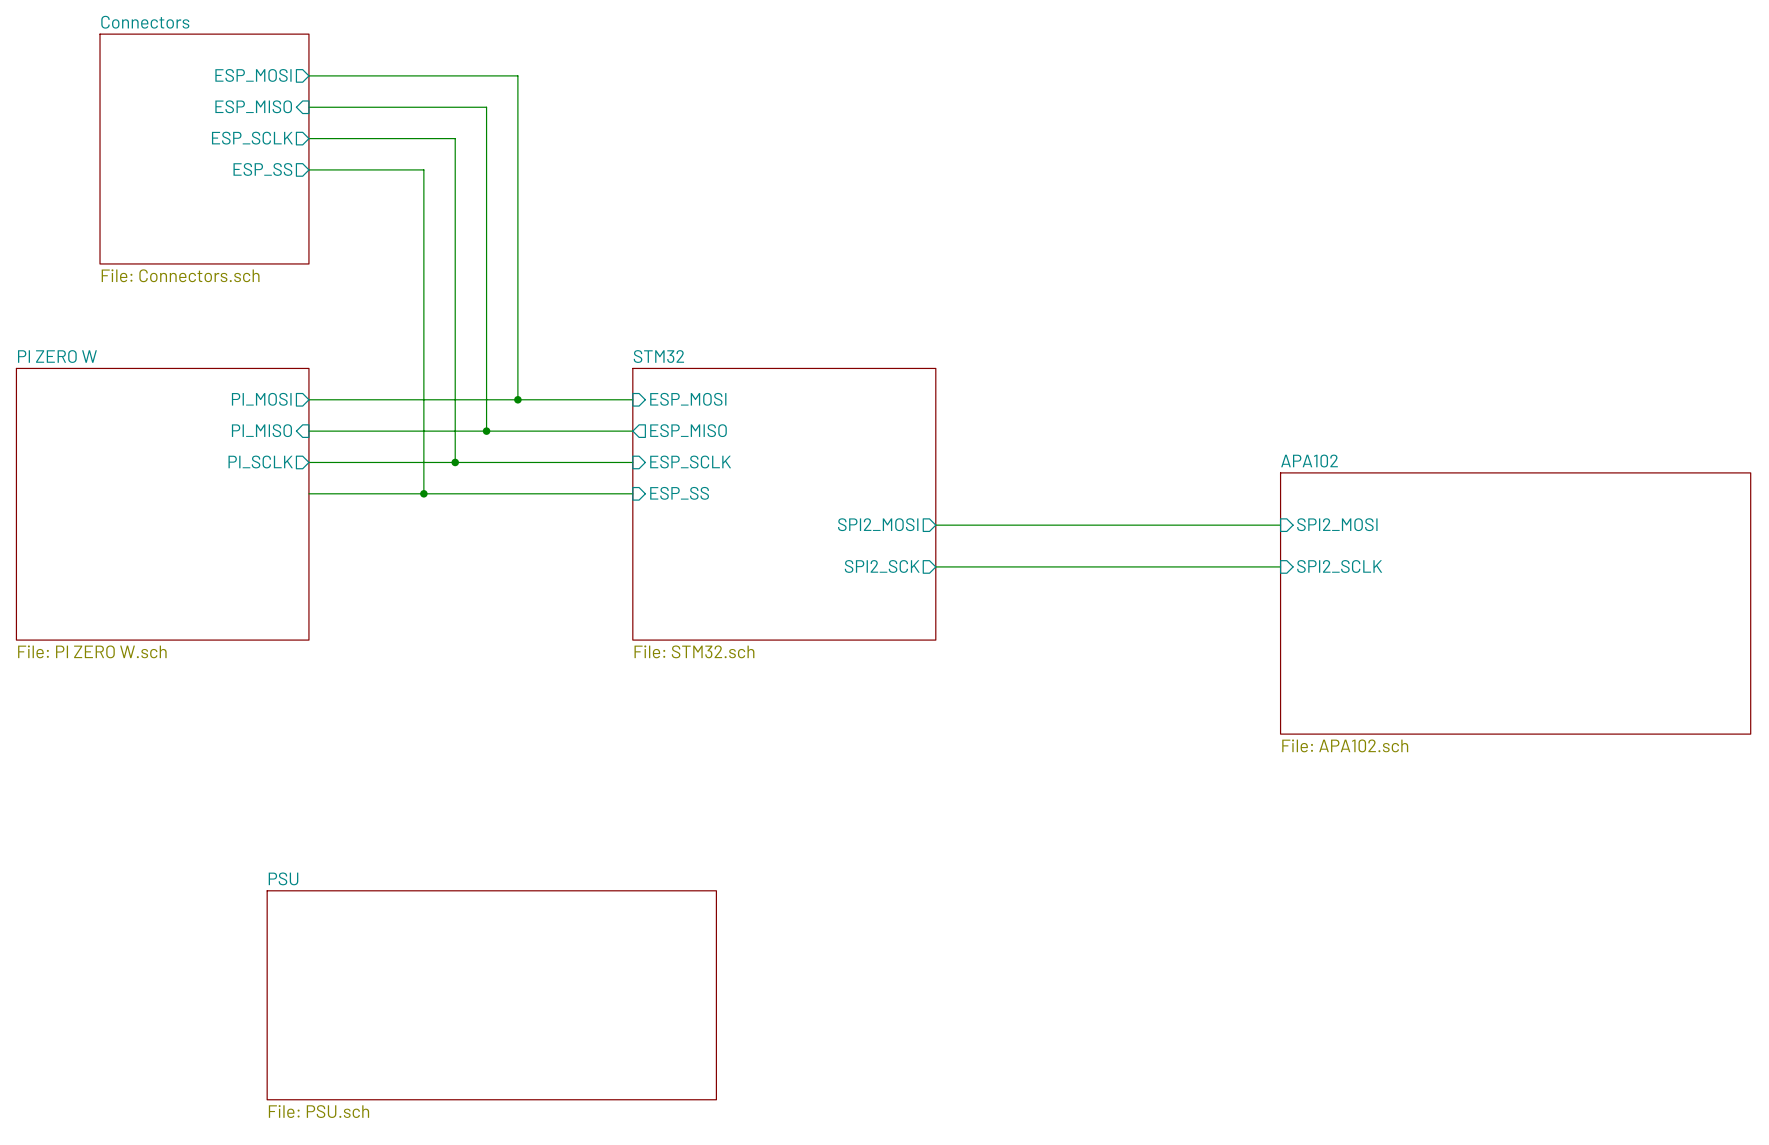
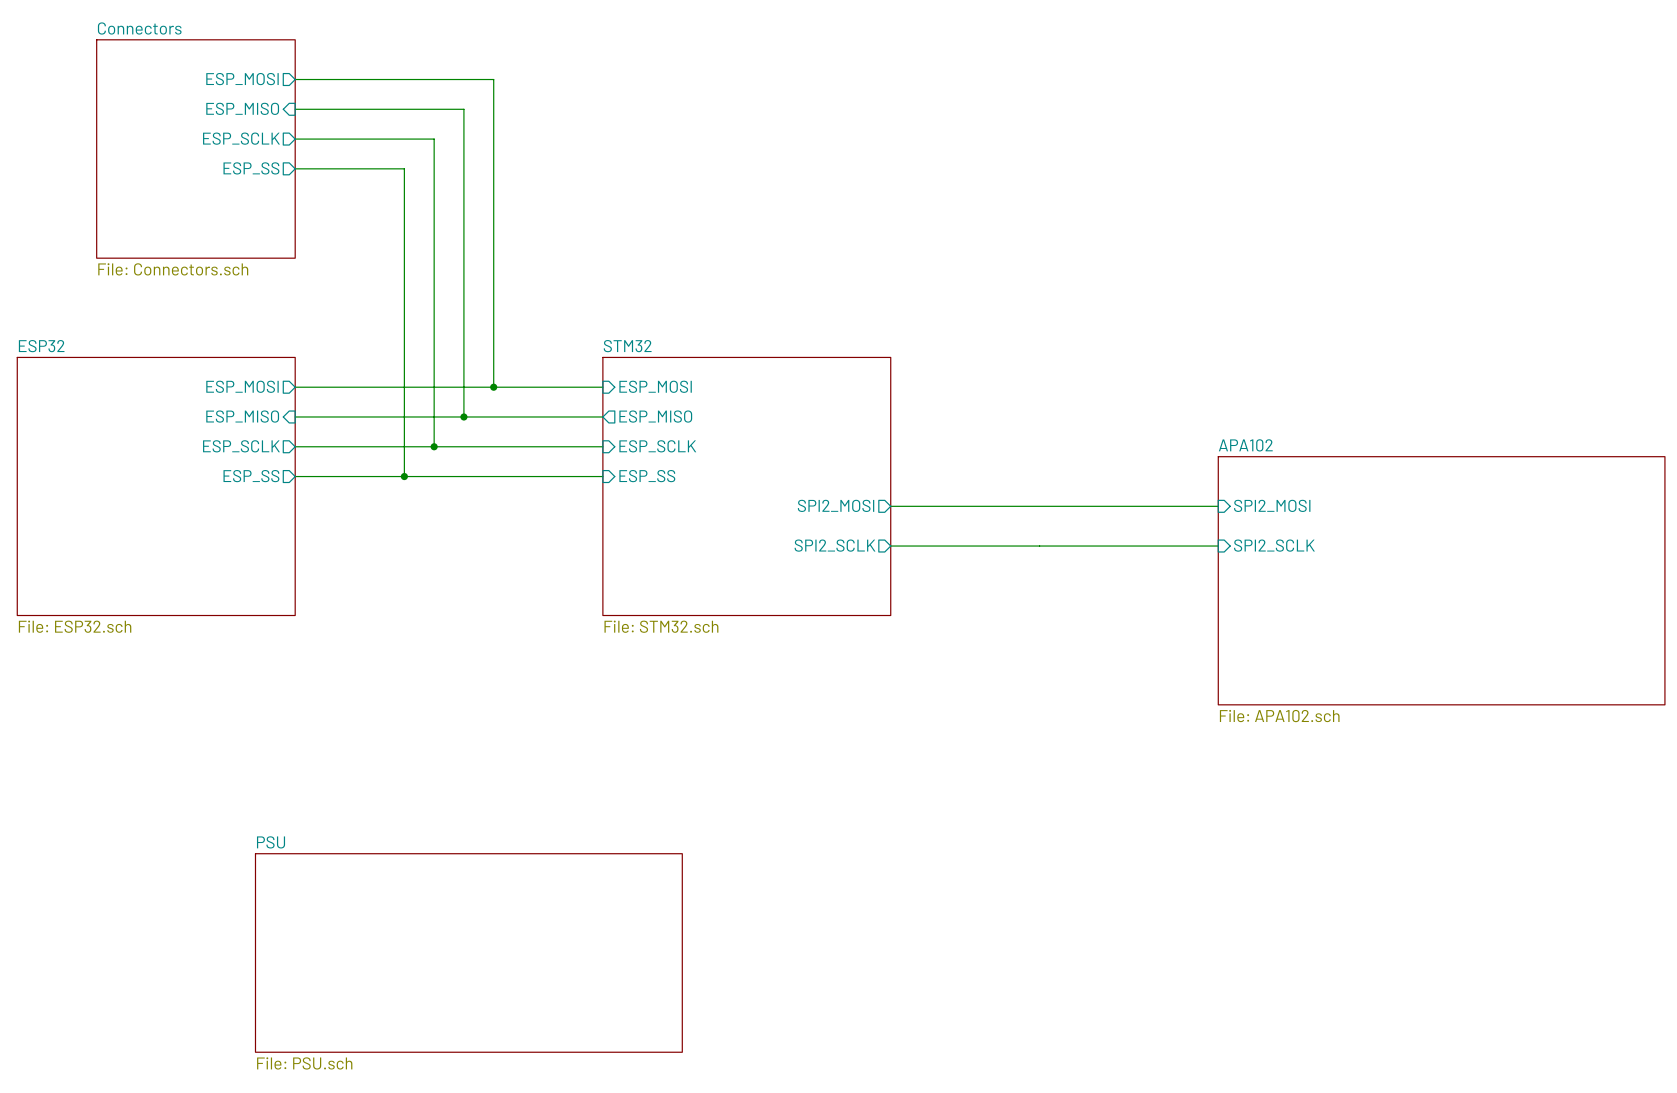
sheet PI ZERO W name: PI ZERO W (57, 356) -> ESP32 (41, 346)
sheet pin: PI_MOSI (261, 399) -> ESP_MOSI (242, 386)
sheet pin: PI_MISO (261, 430) -> ESP_MISO (242, 416)
sheet pin: PI_SCLK (260, 462) -> ESP_SCLK (241, 446)
sheet pin: none -> ESP_SS (251, 476)
sheet pin: SPI2_SCK (882, 566) -> SPI2_SCLK (835, 545)
sheet PI ZERO W value: File: PI ZERO W.sch (92, 651) -> File: ESP32.sch (75, 626)

